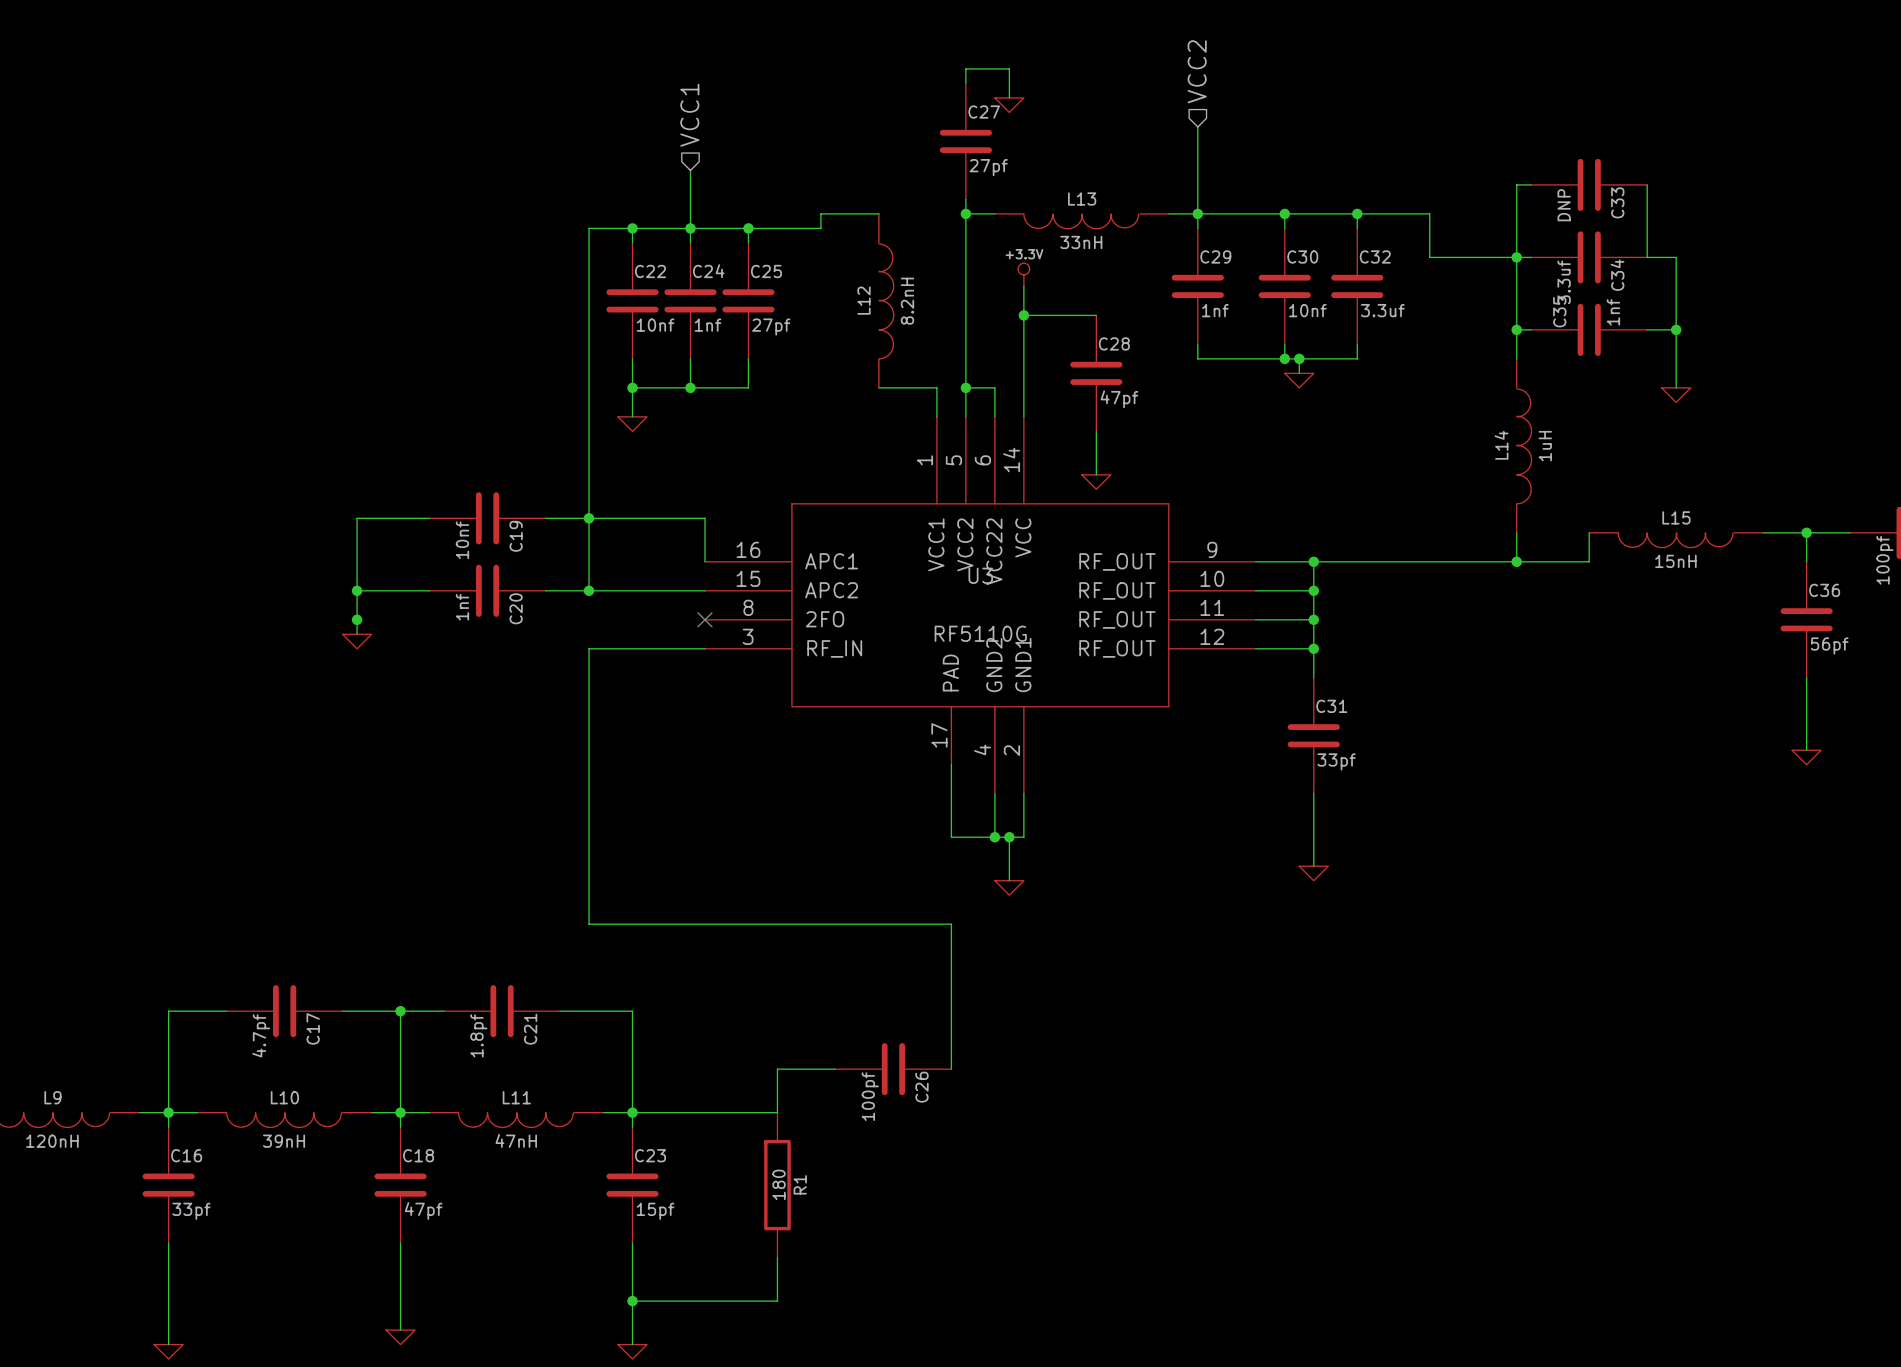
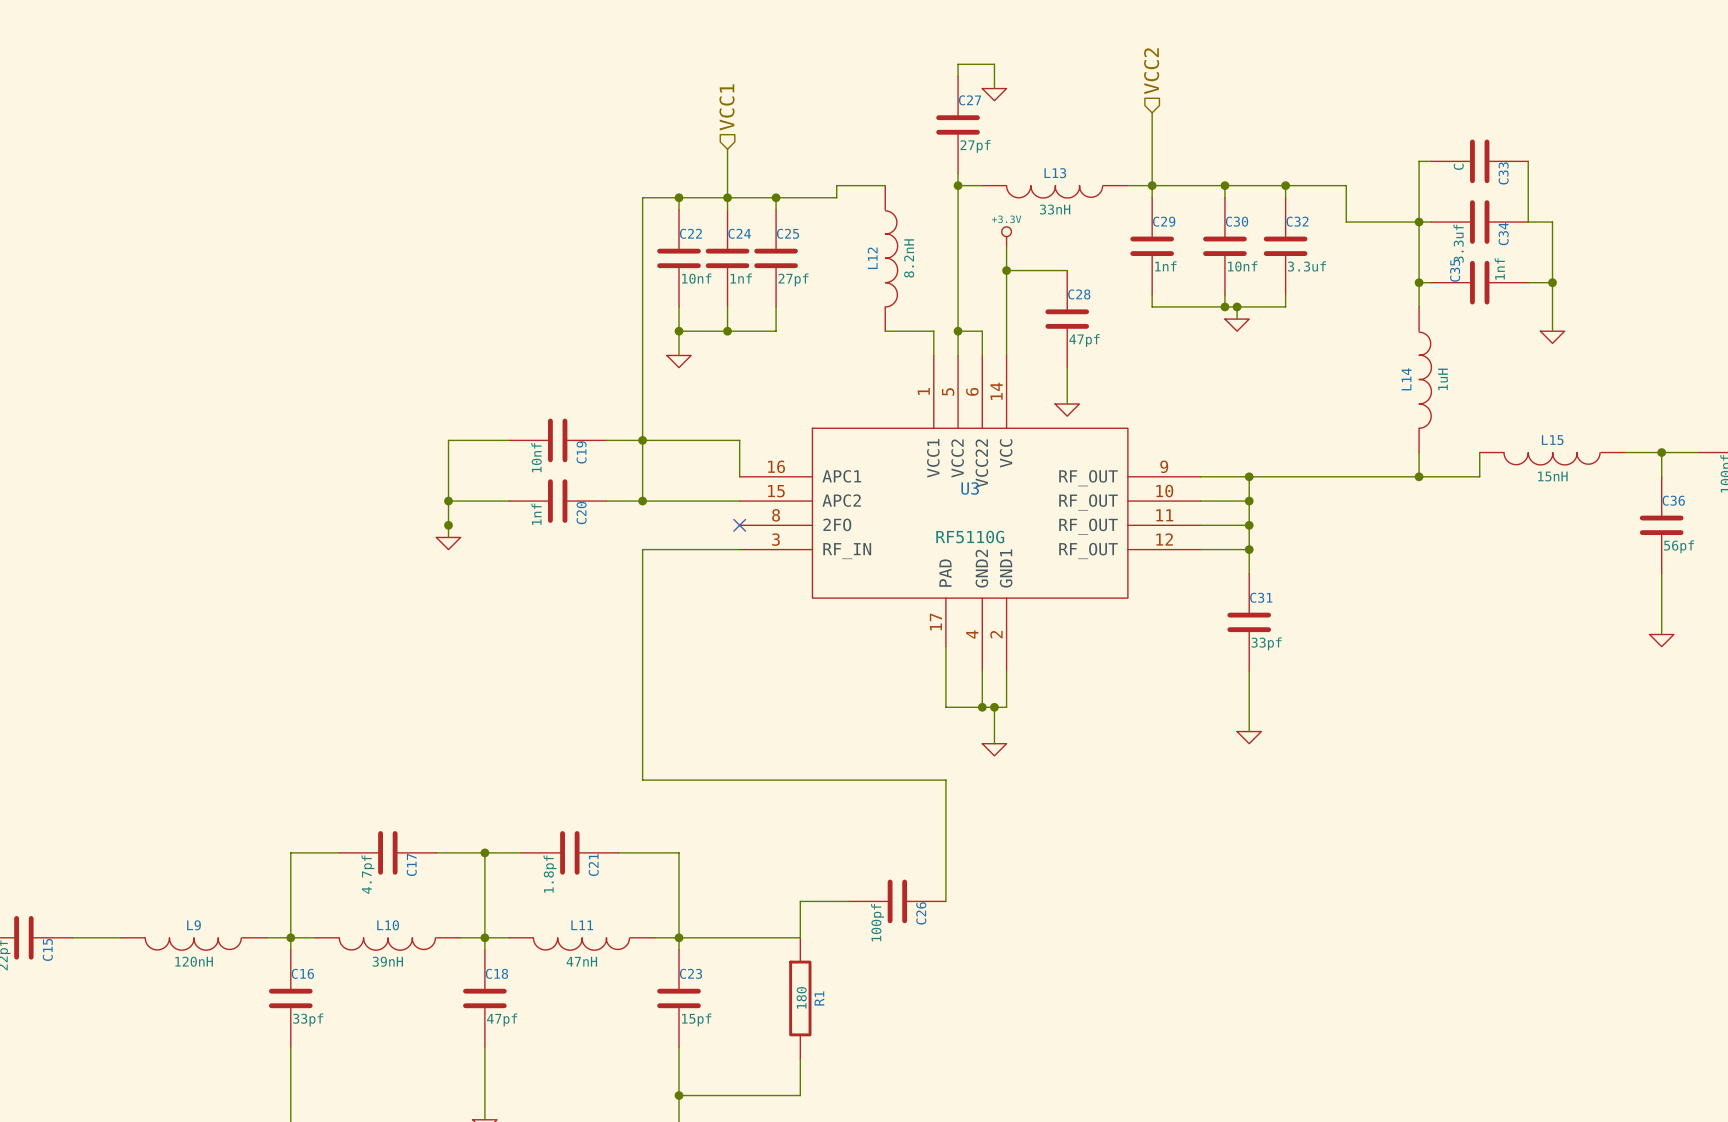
C33 value: DNP (1564, 205) -> C (1458, 166)

